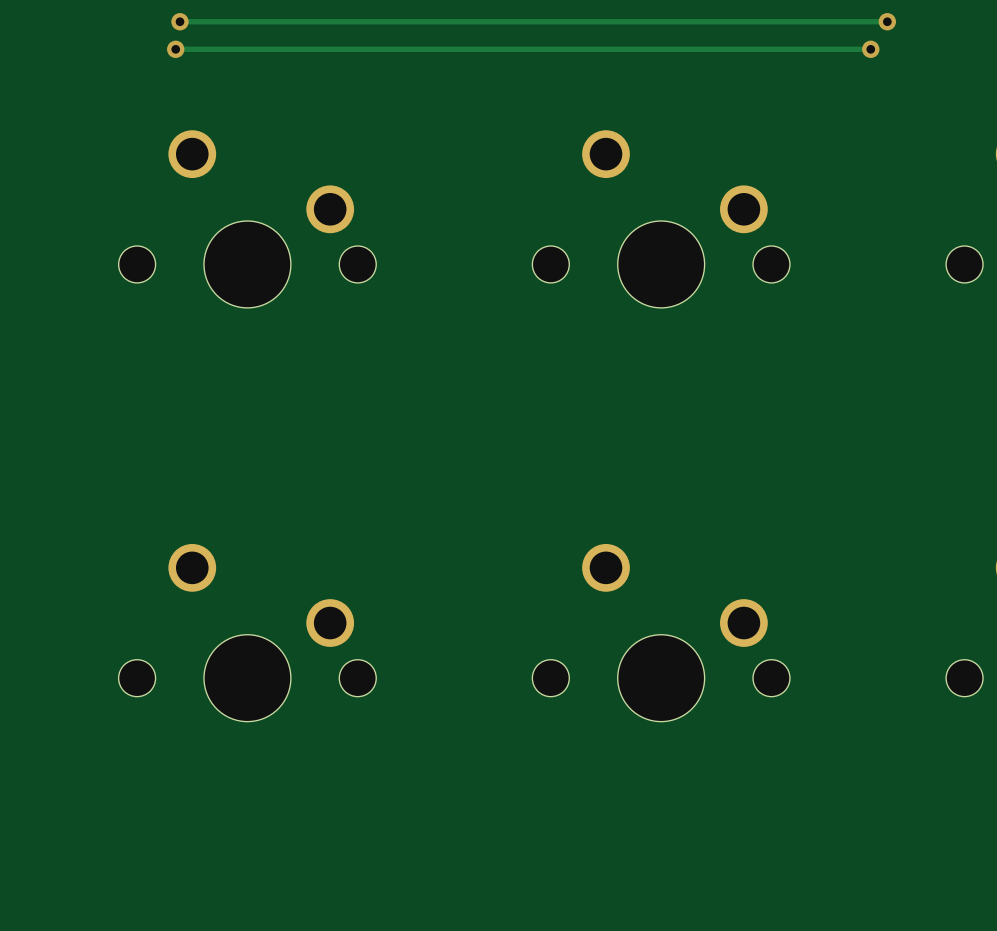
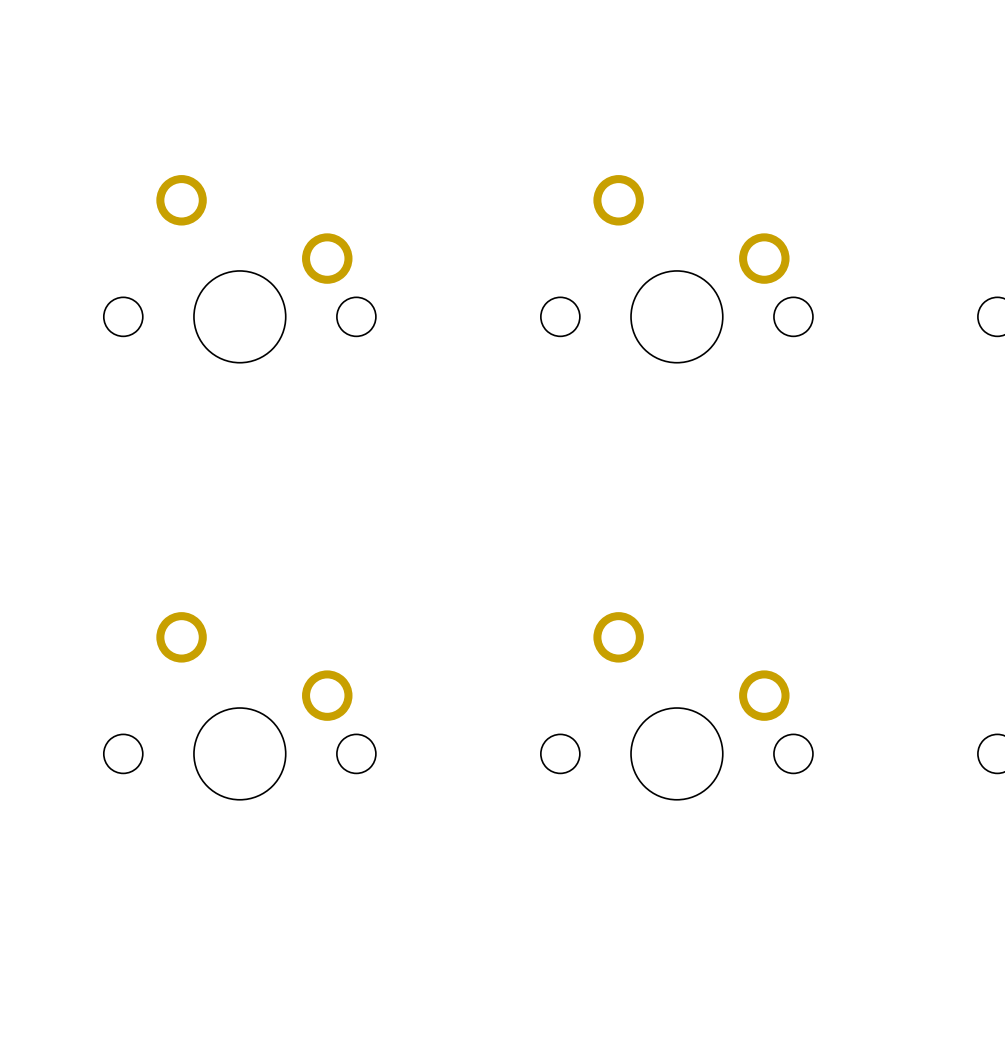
via: (180, 21) -> none
track: (887, 21) (180, 21) -> none
via: (887, 21) -> none
via: (175, 49) -> none
track: (870, 49) (175, 49) -> none
via: (870, 49) -> none

